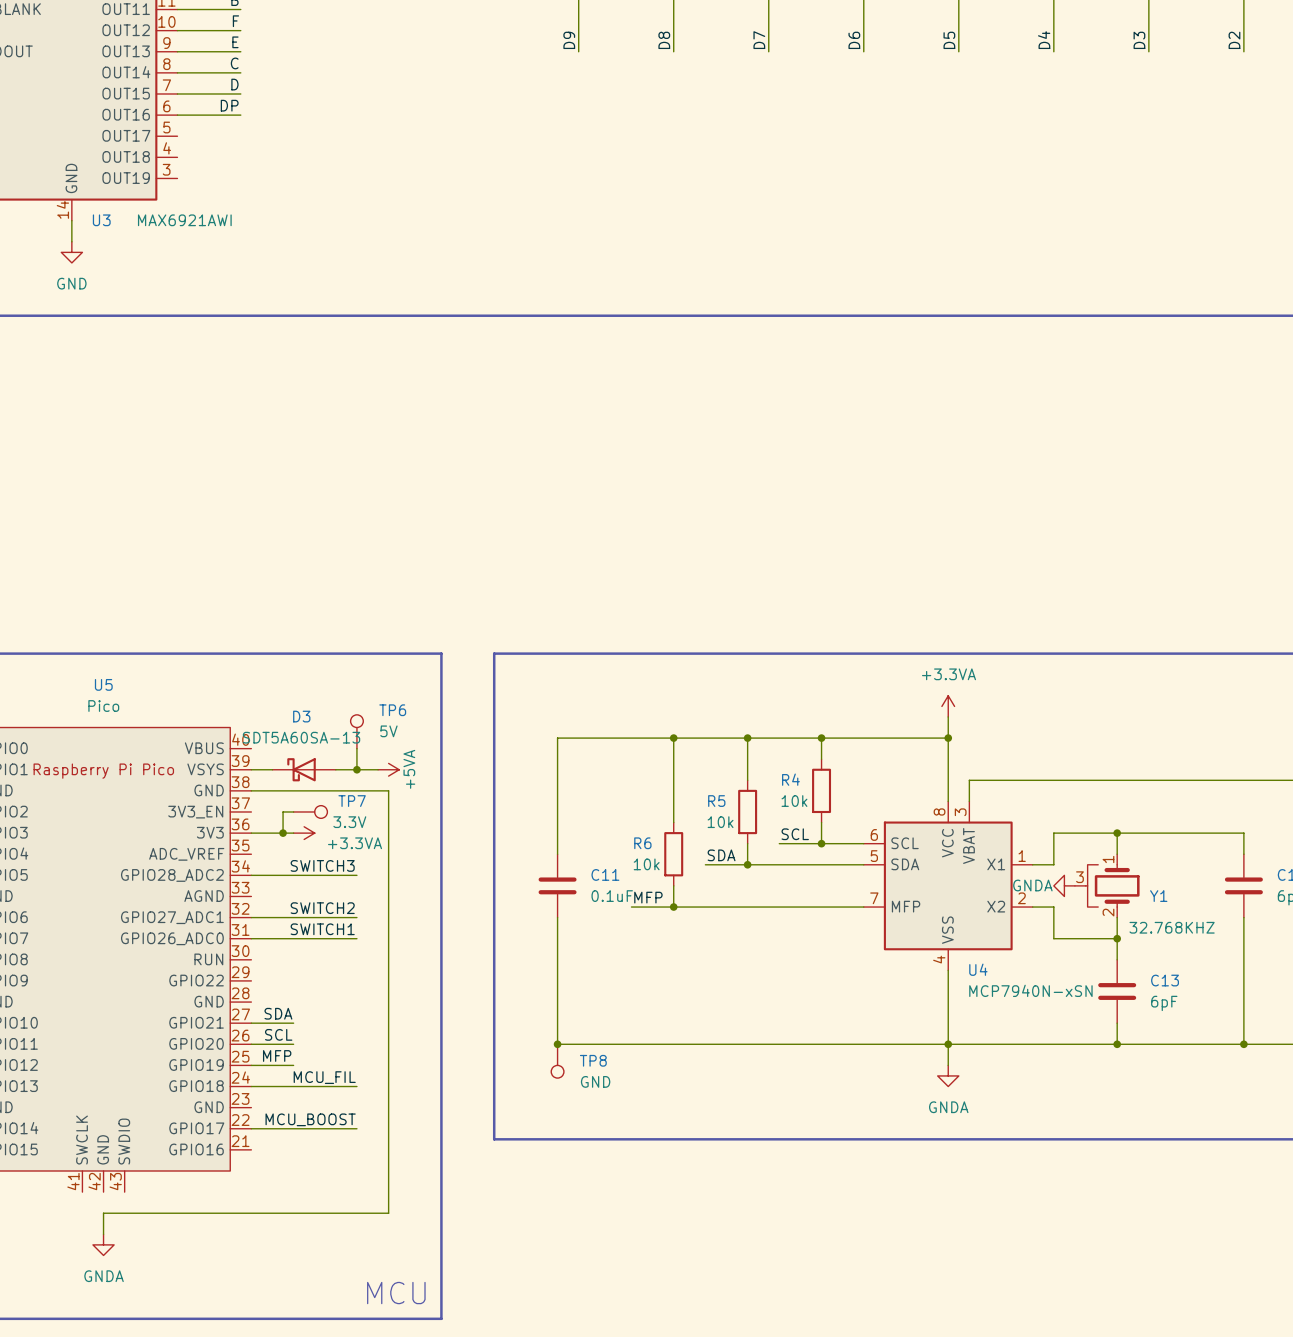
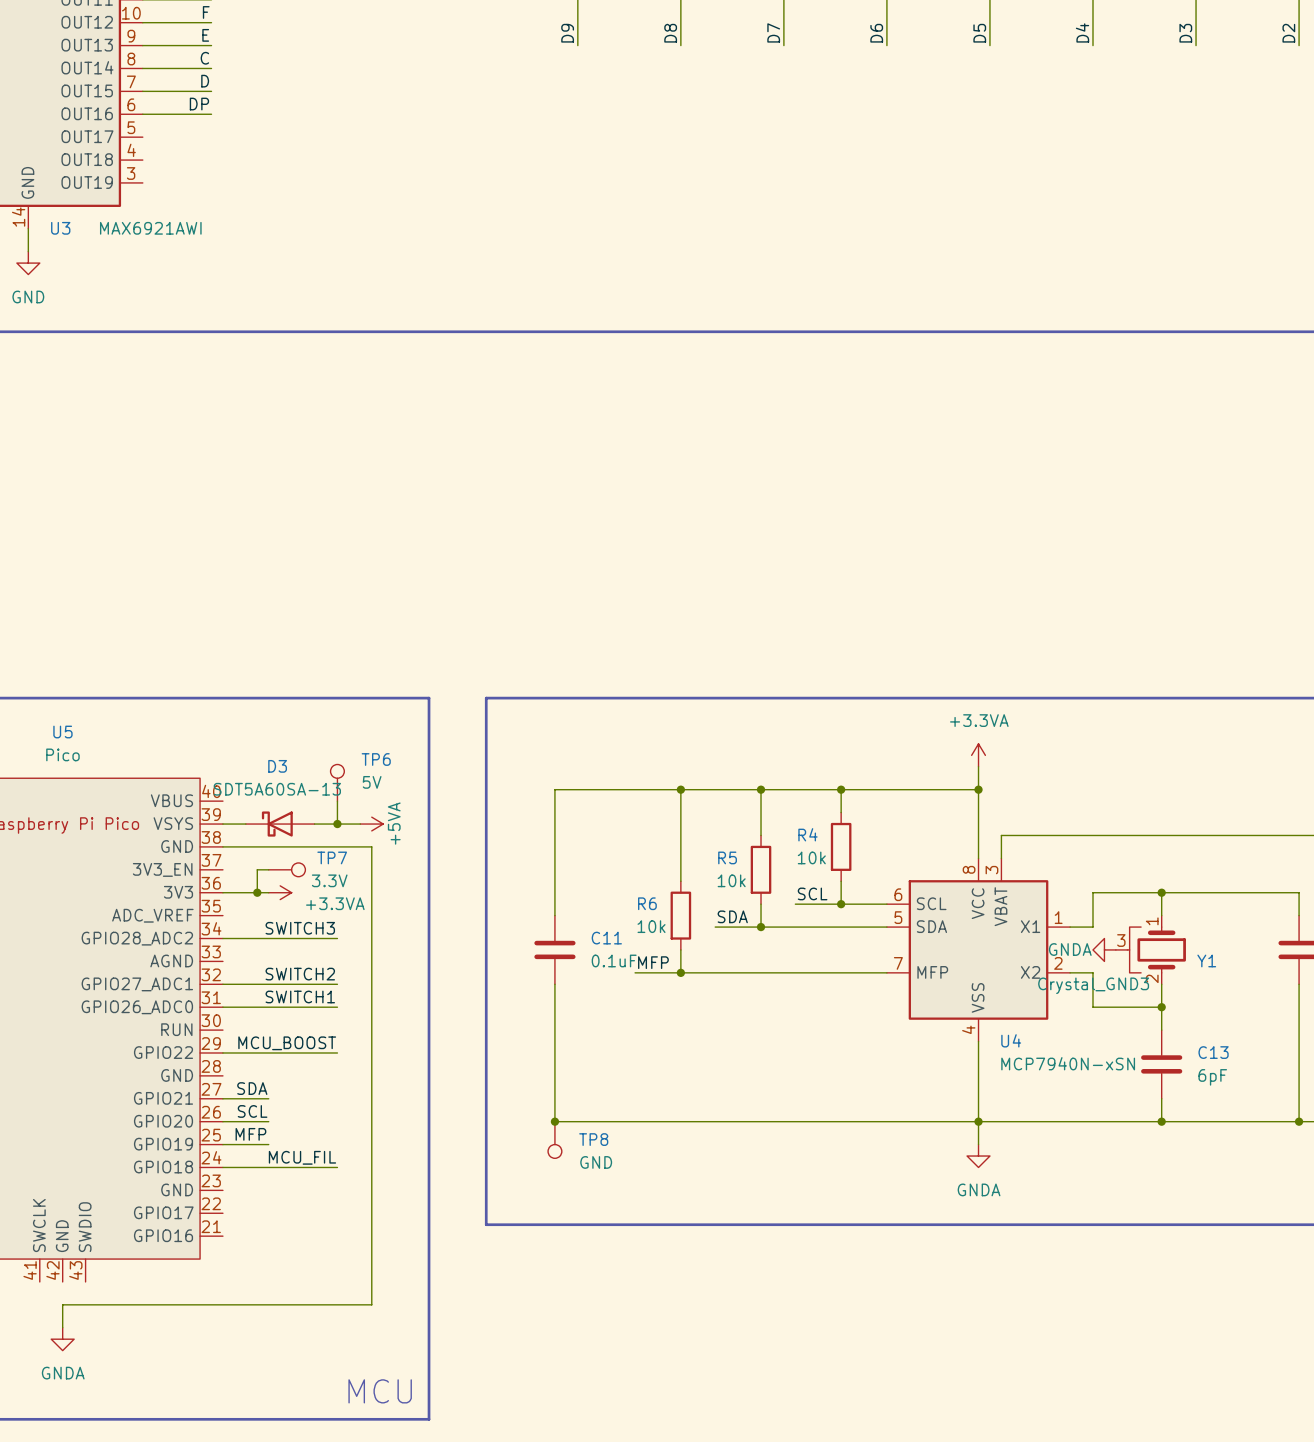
Y1 value: 32.768KHZ (1172, 927) -> Crystal_GND3 (1093, 985)
label position: MCU_BOOST (310, 1119) -> MCU_BOOST (287, 1043)
wire: (251, 1128) (356, 1128) -> (222, 1052) (337, 1052)

